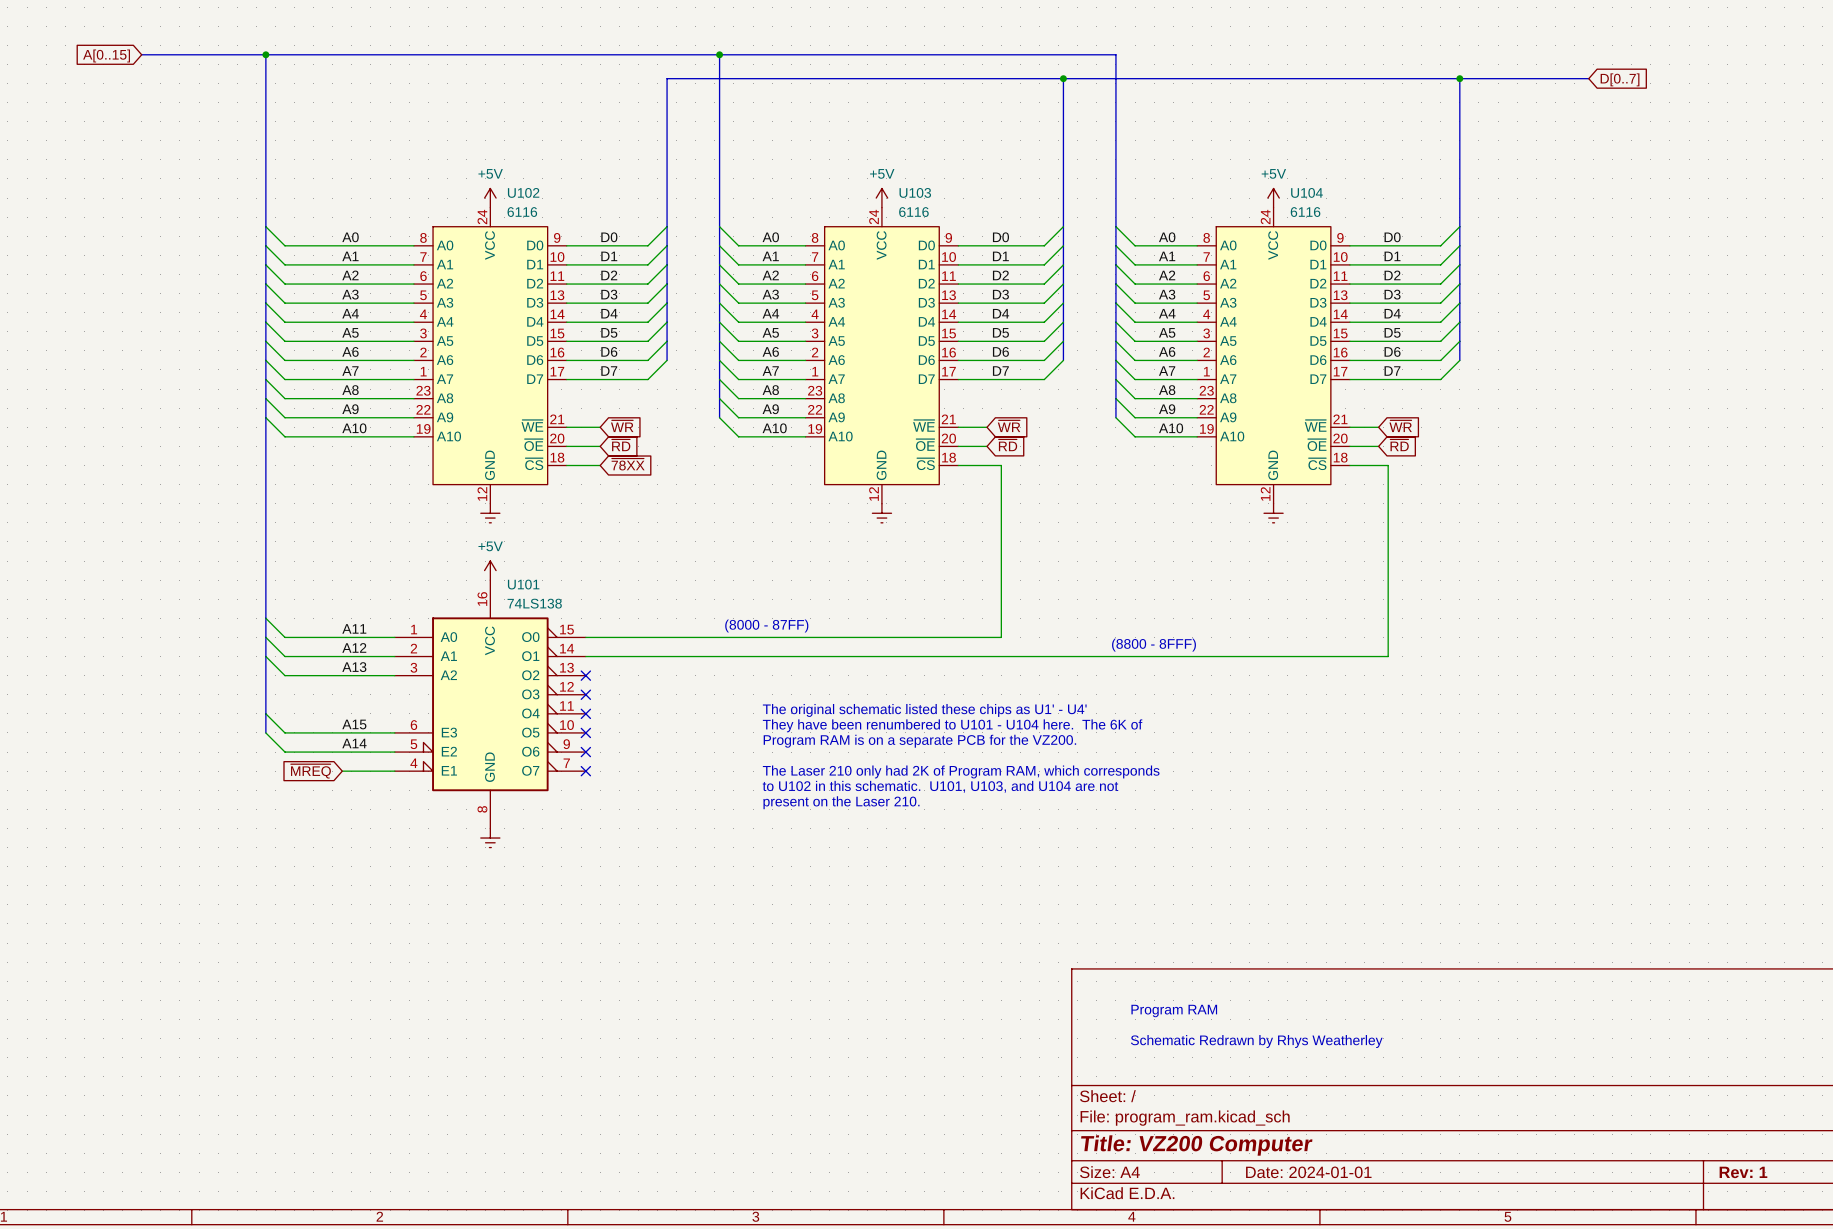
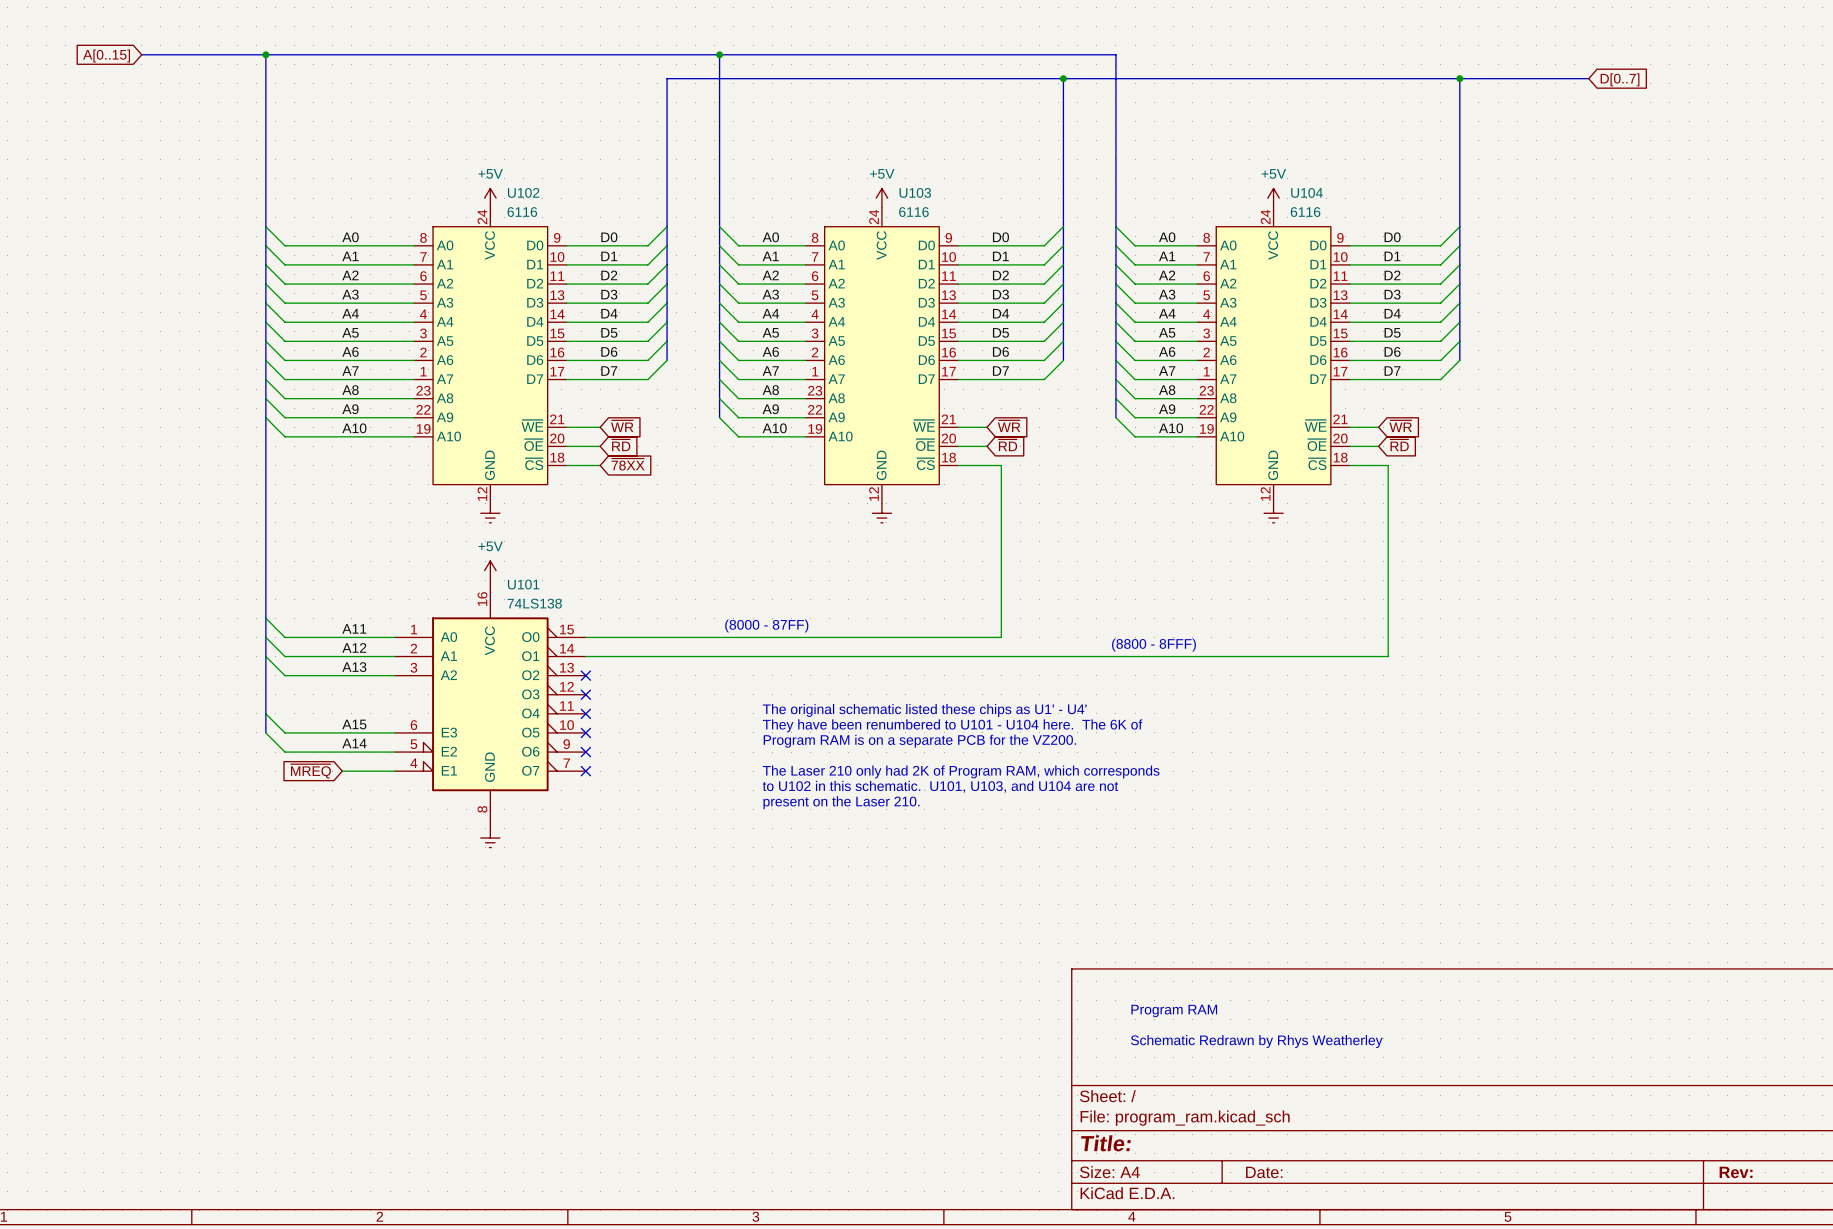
title block: Title: VZ200 Computer (1196, 1145) -> Title: (1105, 1143)
title block: Date: 2024-01-01 (1308, 1172) -> Date: (1264, 1172)
title block: Rev: 1 (1743, 1172) -> Rev: (1736, 1172)

